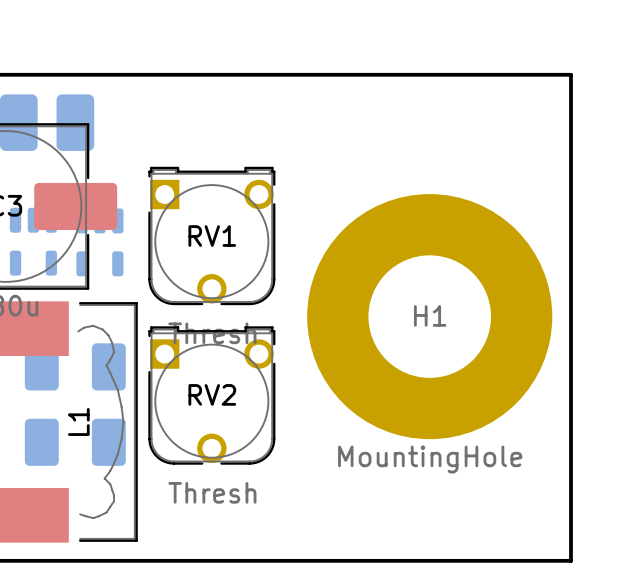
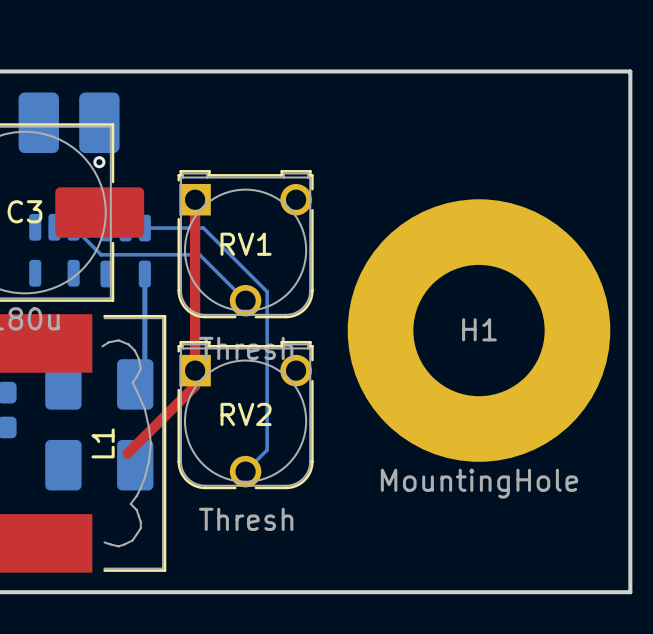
via: none -> (99, 162)
top track: none -> (195, 199) (195, 386) (127, 453)
bottom track: none -> (73, 227) (101, 254) (199, 254) (245, 300)
bottom track: none -> (144, 228) (203, 228) (267, 291) (267, 450) (245, 471)
bottom track: none -> (144, 274) (144, 374) (135, 384)

